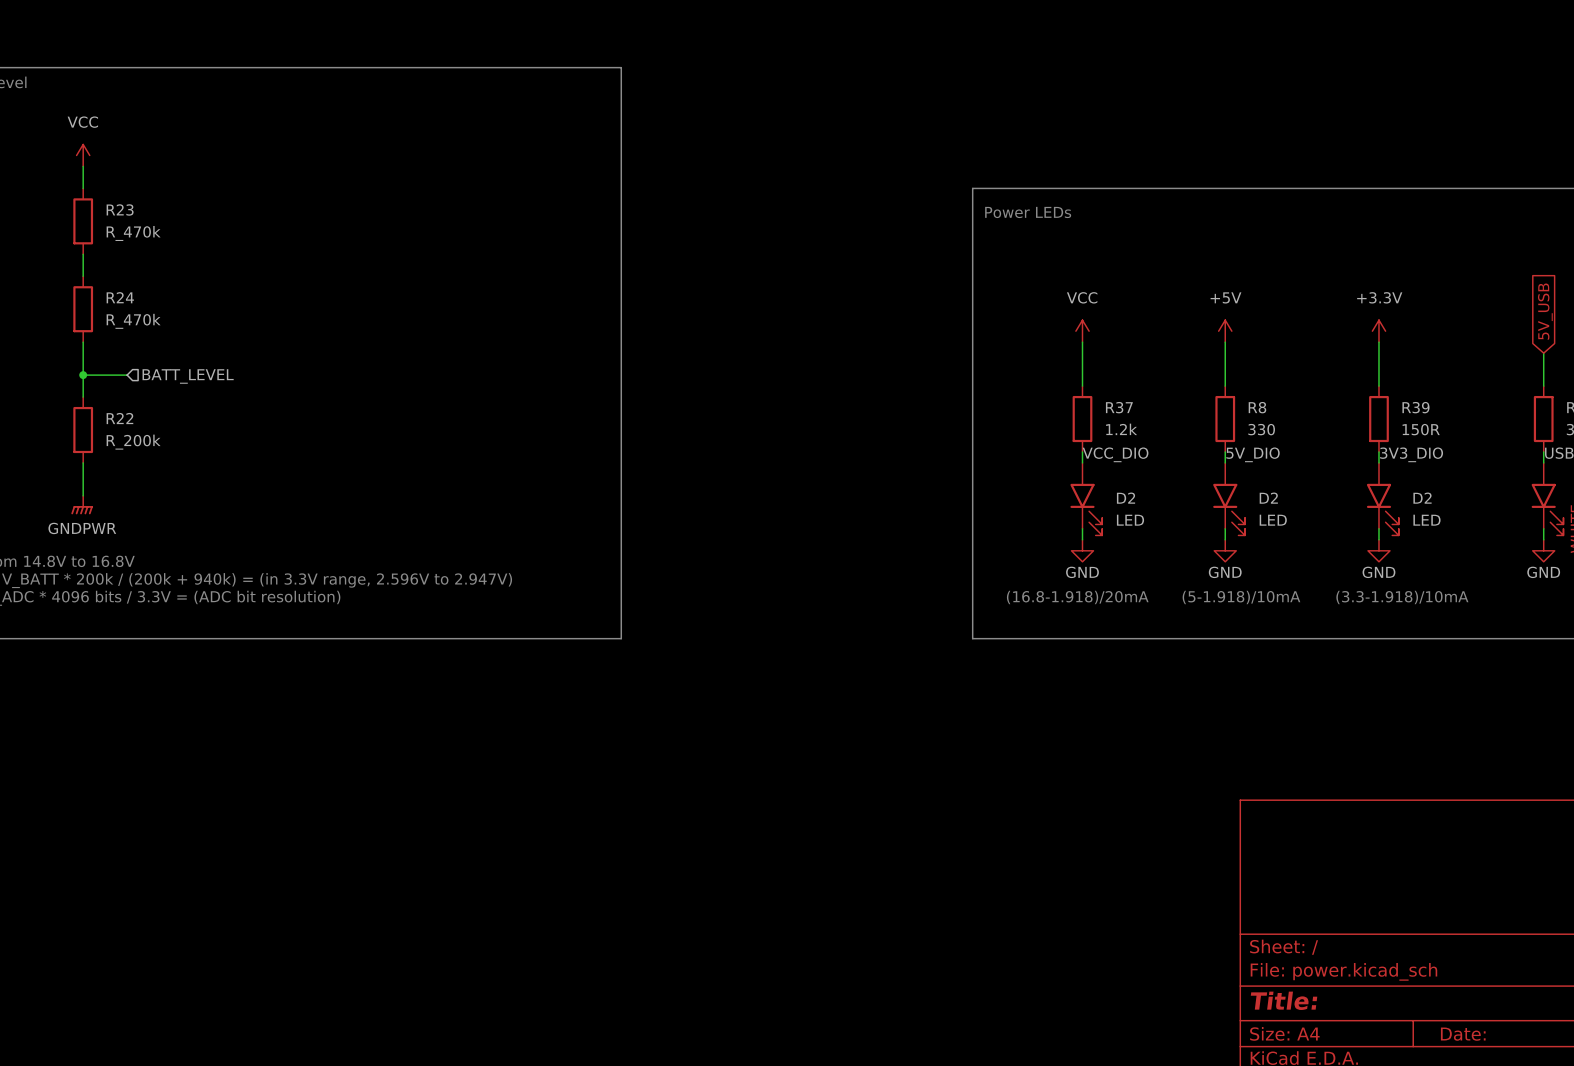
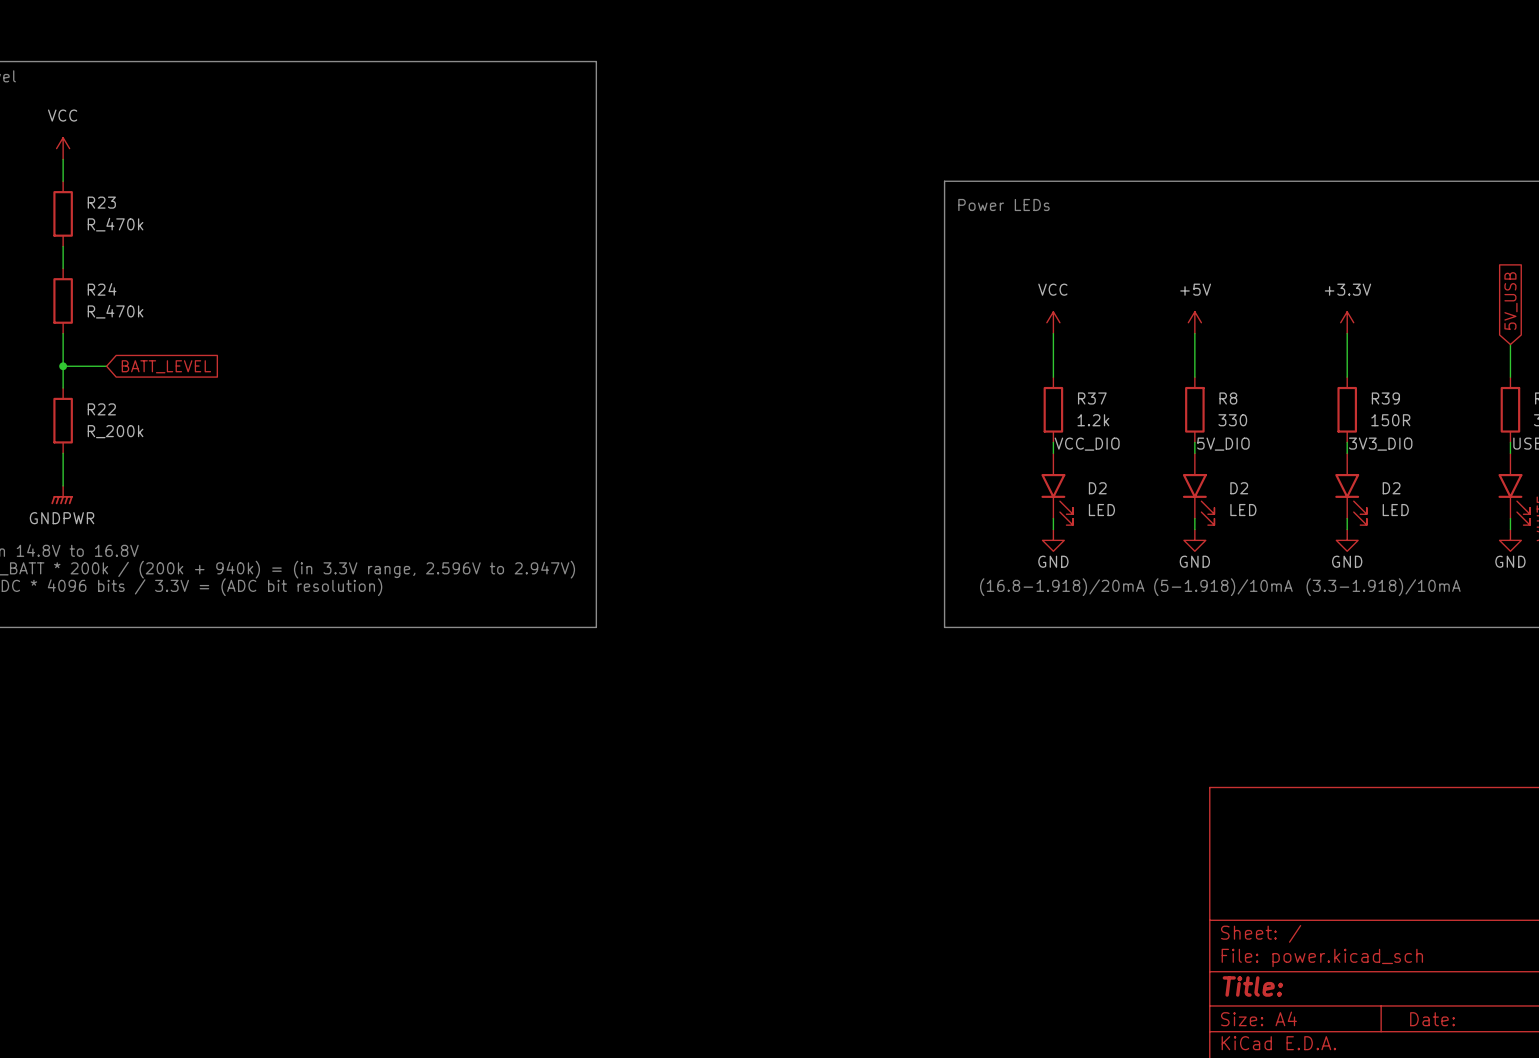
global label: none -> BATT_LEVEL (166, 366)
hierarchical label: BATT_LEVEL (188, 376) -> none

